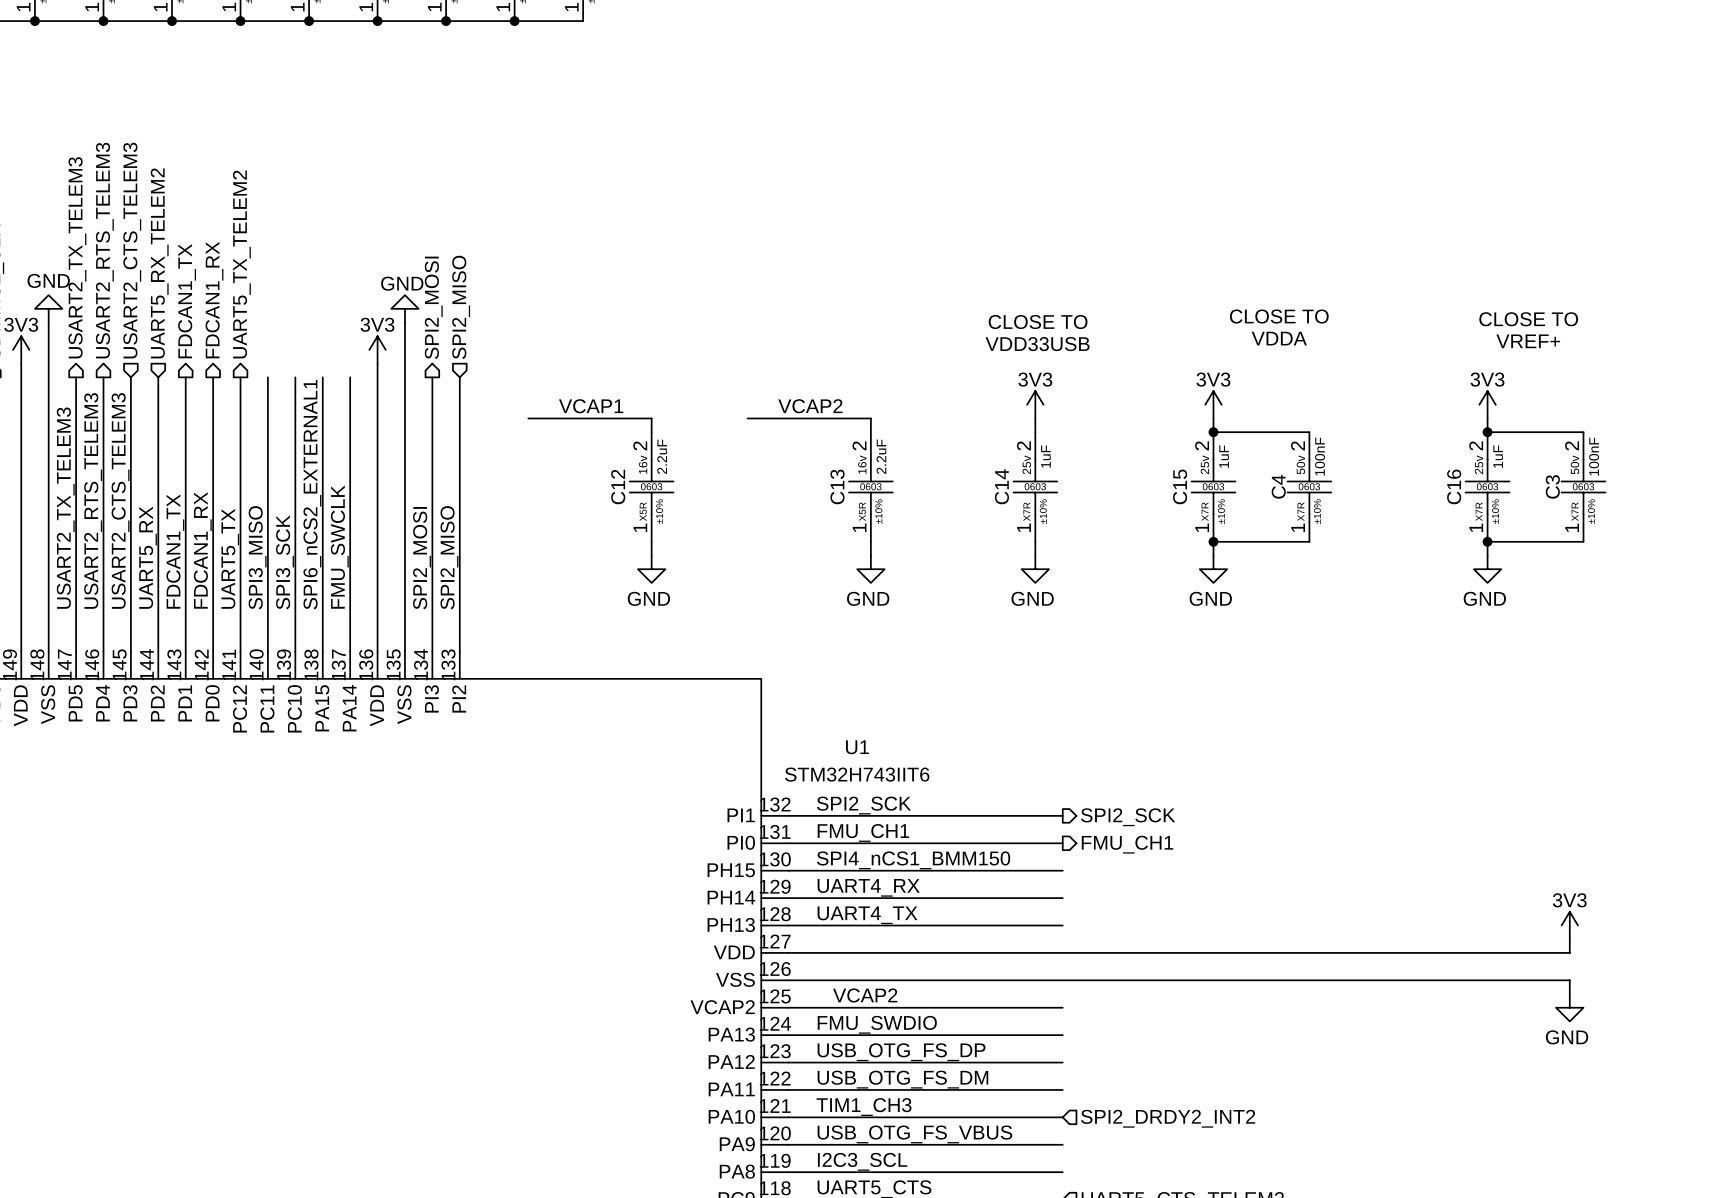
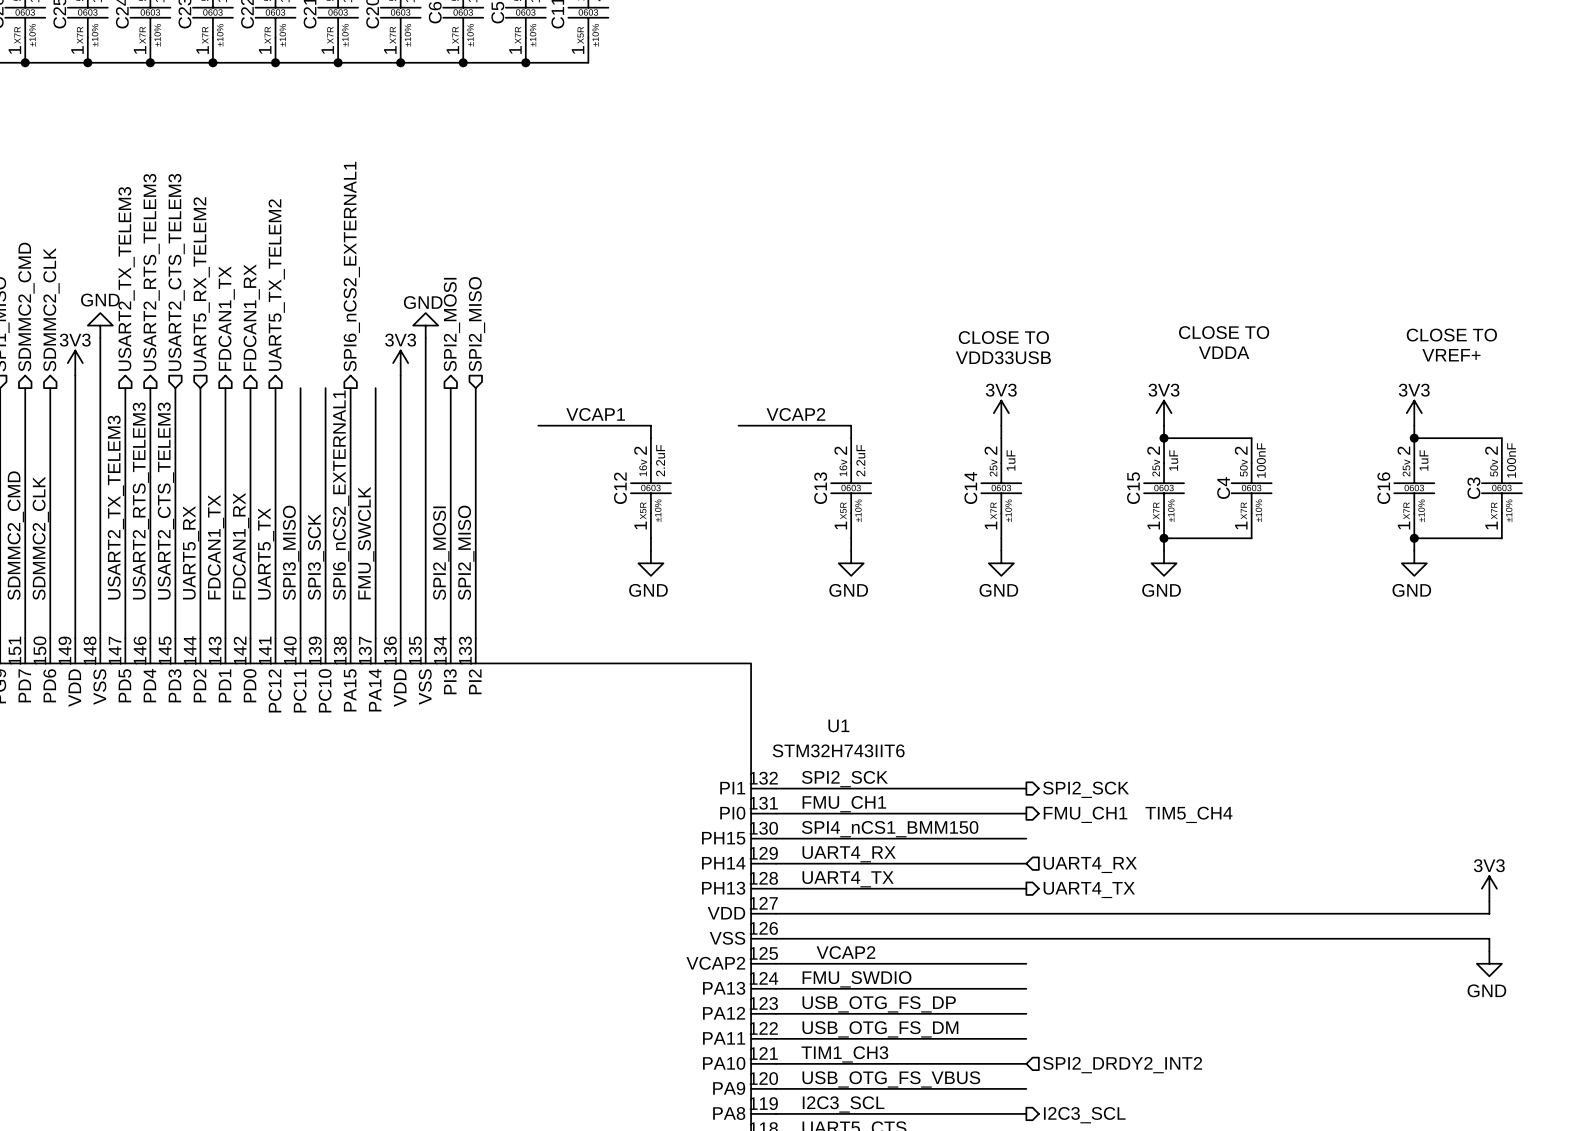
hierarchical label: none -> SPI6_nCS2_EXTERNAL1 (351, 266)
text: none -> TIM5_CH4 (1188, 814)
hierarchical label: none -> UART4_RX (1090, 865)
hierarchical label: none -> UART4_TX (1089, 890)
hierarchical label: none -> I2C3_SCL (1084, 1115)

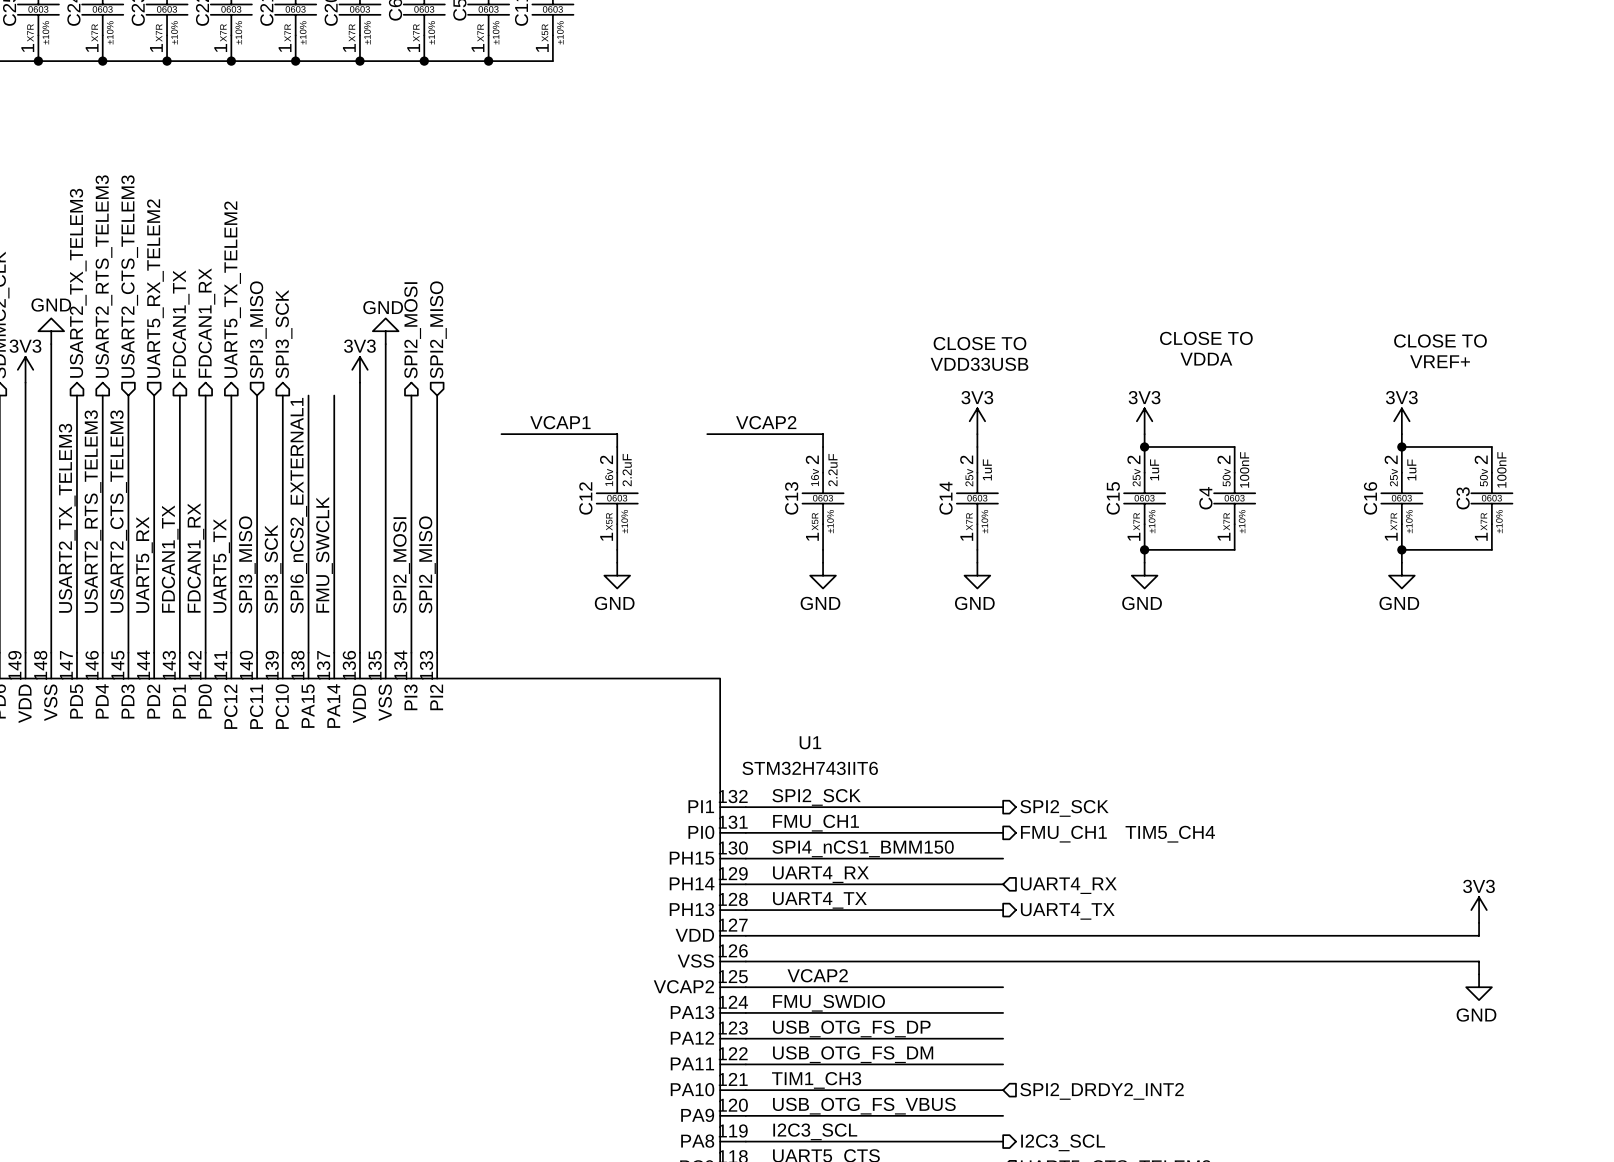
hierarchical label: SPI6_nCS2_EXTERNAL1 (351, 266) -> none
hierarchical label: none -> SPI3_MISO (258, 329)
hierarchical label: none -> SPI3_SCK (284, 334)

